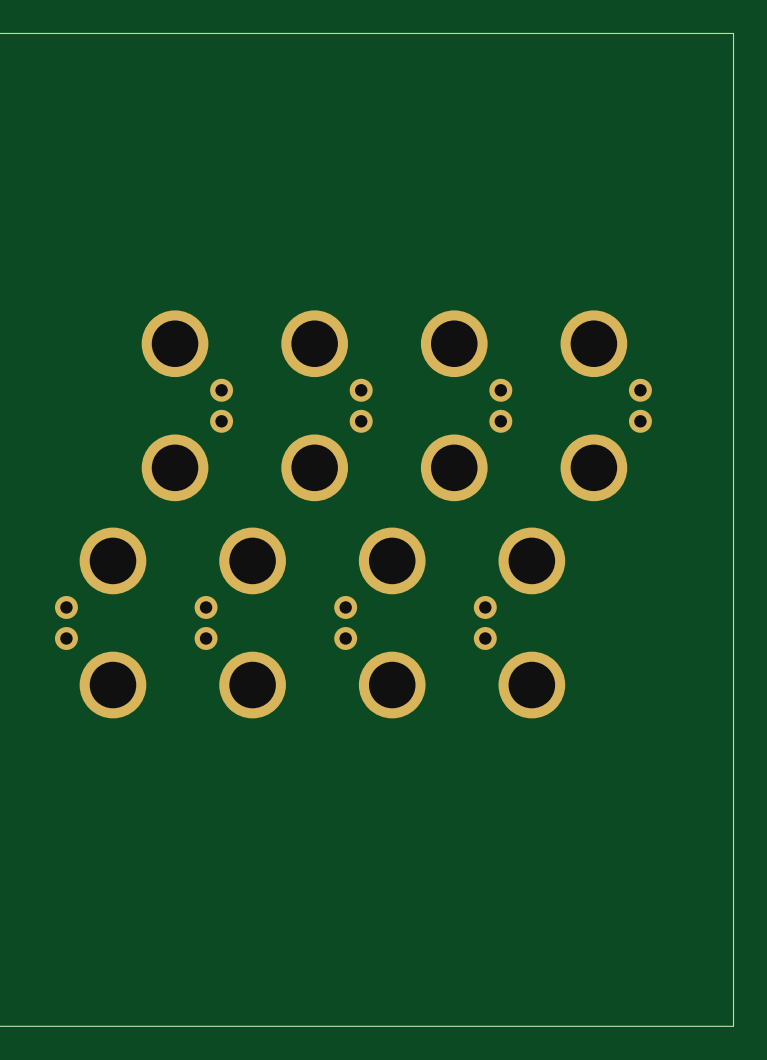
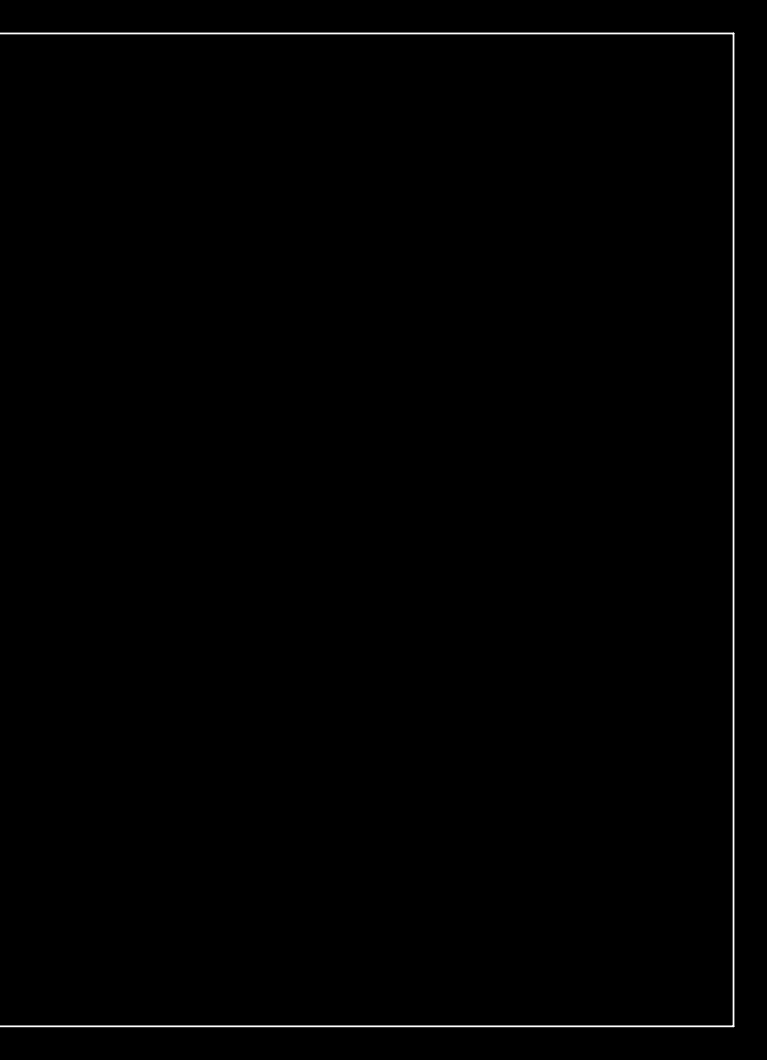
part: (175, 343) -> none
part: (314, 343) -> none
part: (454, 343) -> none
part: (593, 343) -> none
part: (221, 405) -> none
part: (361, 405) -> none
part: (500, 405) -> none
part: (640, 405) -> none
part: (175, 467) -> none
part: (314, 467) -> none
part: (454, 467) -> none
part: (593, 467) -> none
part: (112, 560) -> none
part: (252, 560) -> none
part: (392, 560) -> none
part: (531, 560) -> none
part: (66, 622) -> none
part: (206, 622) -> none
part: (345, 622) -> none
part: (485, 622) -> none
part: (112, 685) -> none
part: (252, 685) -> none
part: (392, 685) -> none
part: (531, 685) -> none

